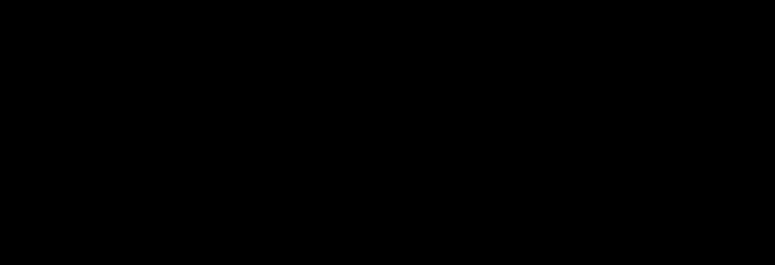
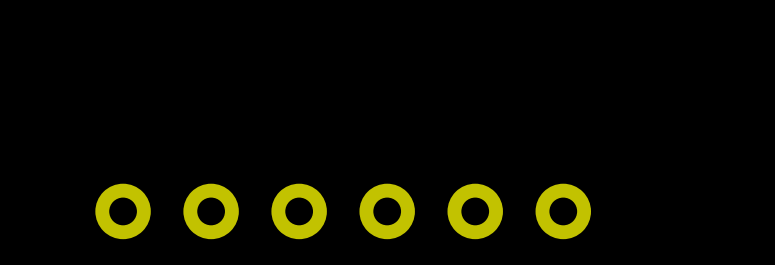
part: none -> (167, 211)
part: none -> (343, 211)
part: none -> (519, 211)

